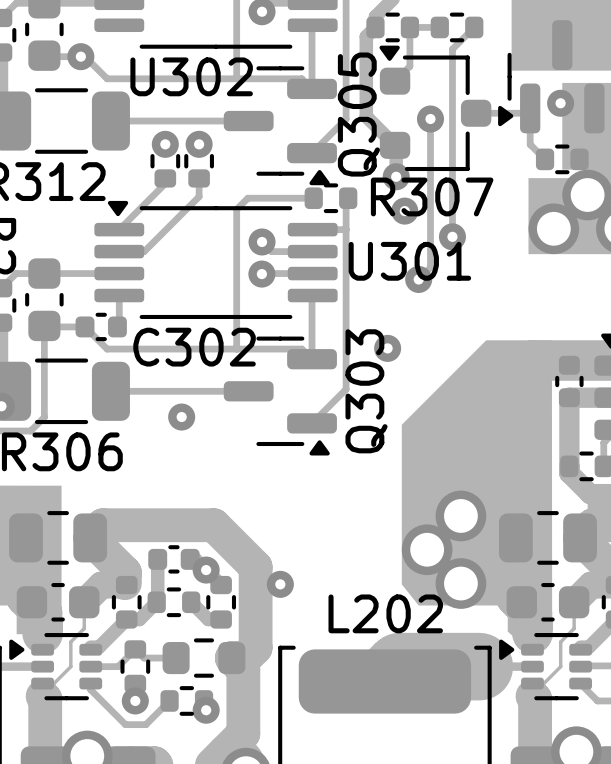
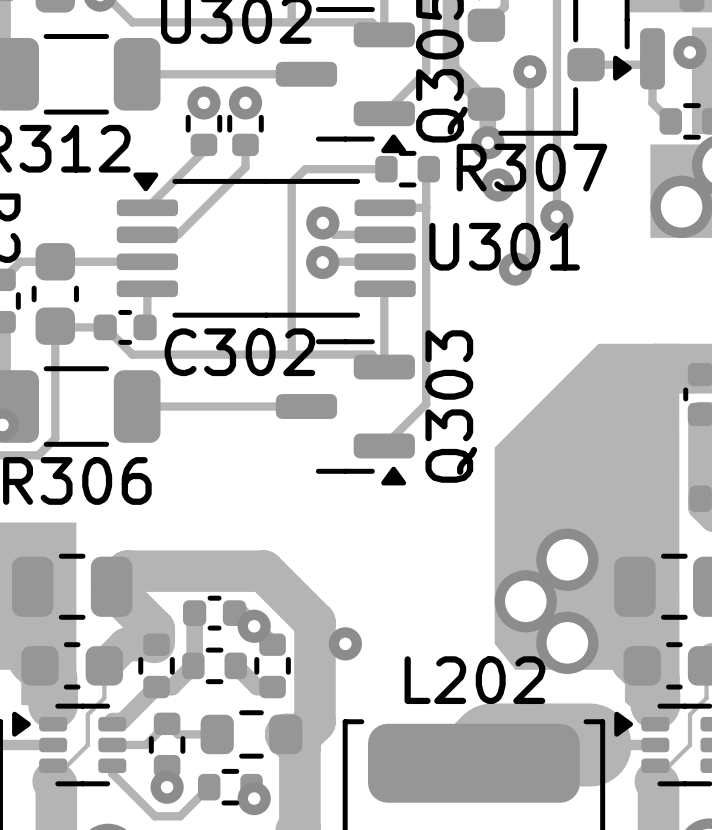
via: (387, 348) -> none
via: (181, 417) -> none

